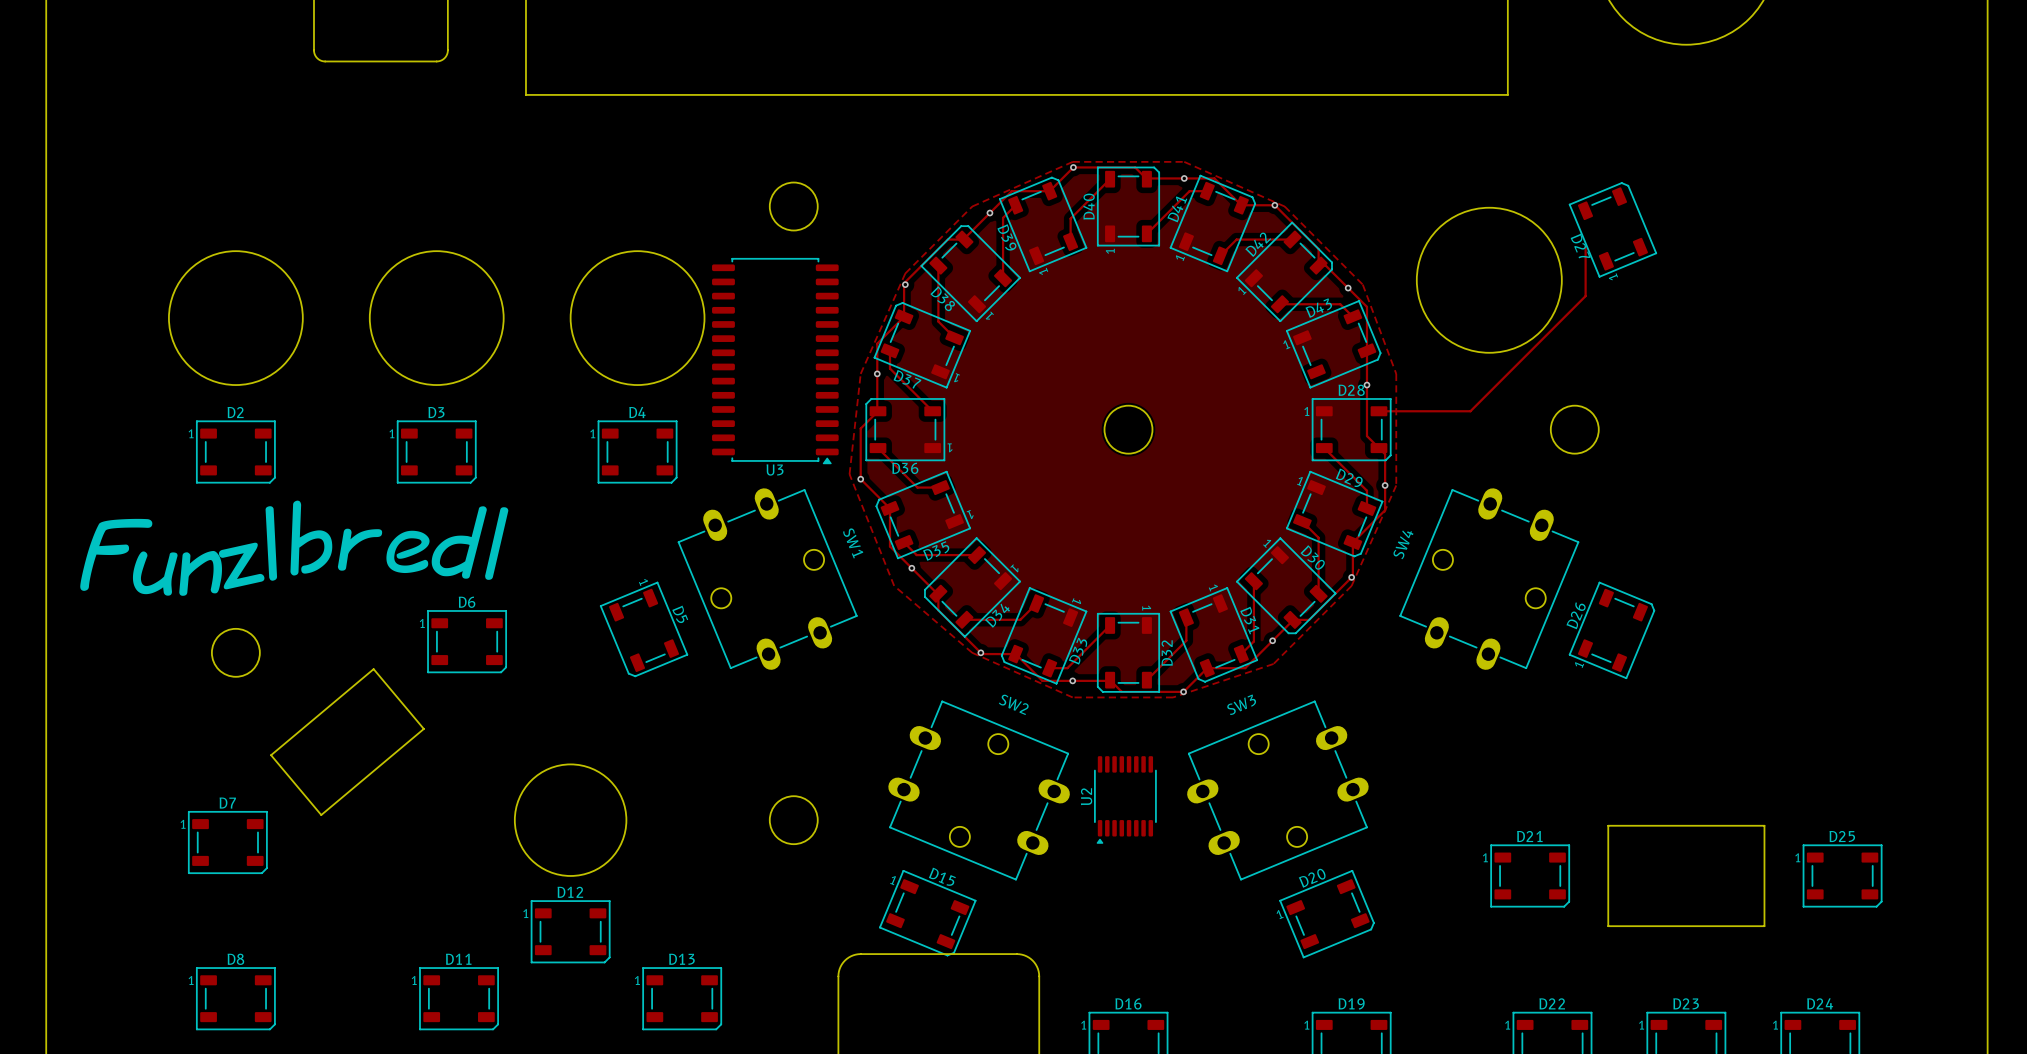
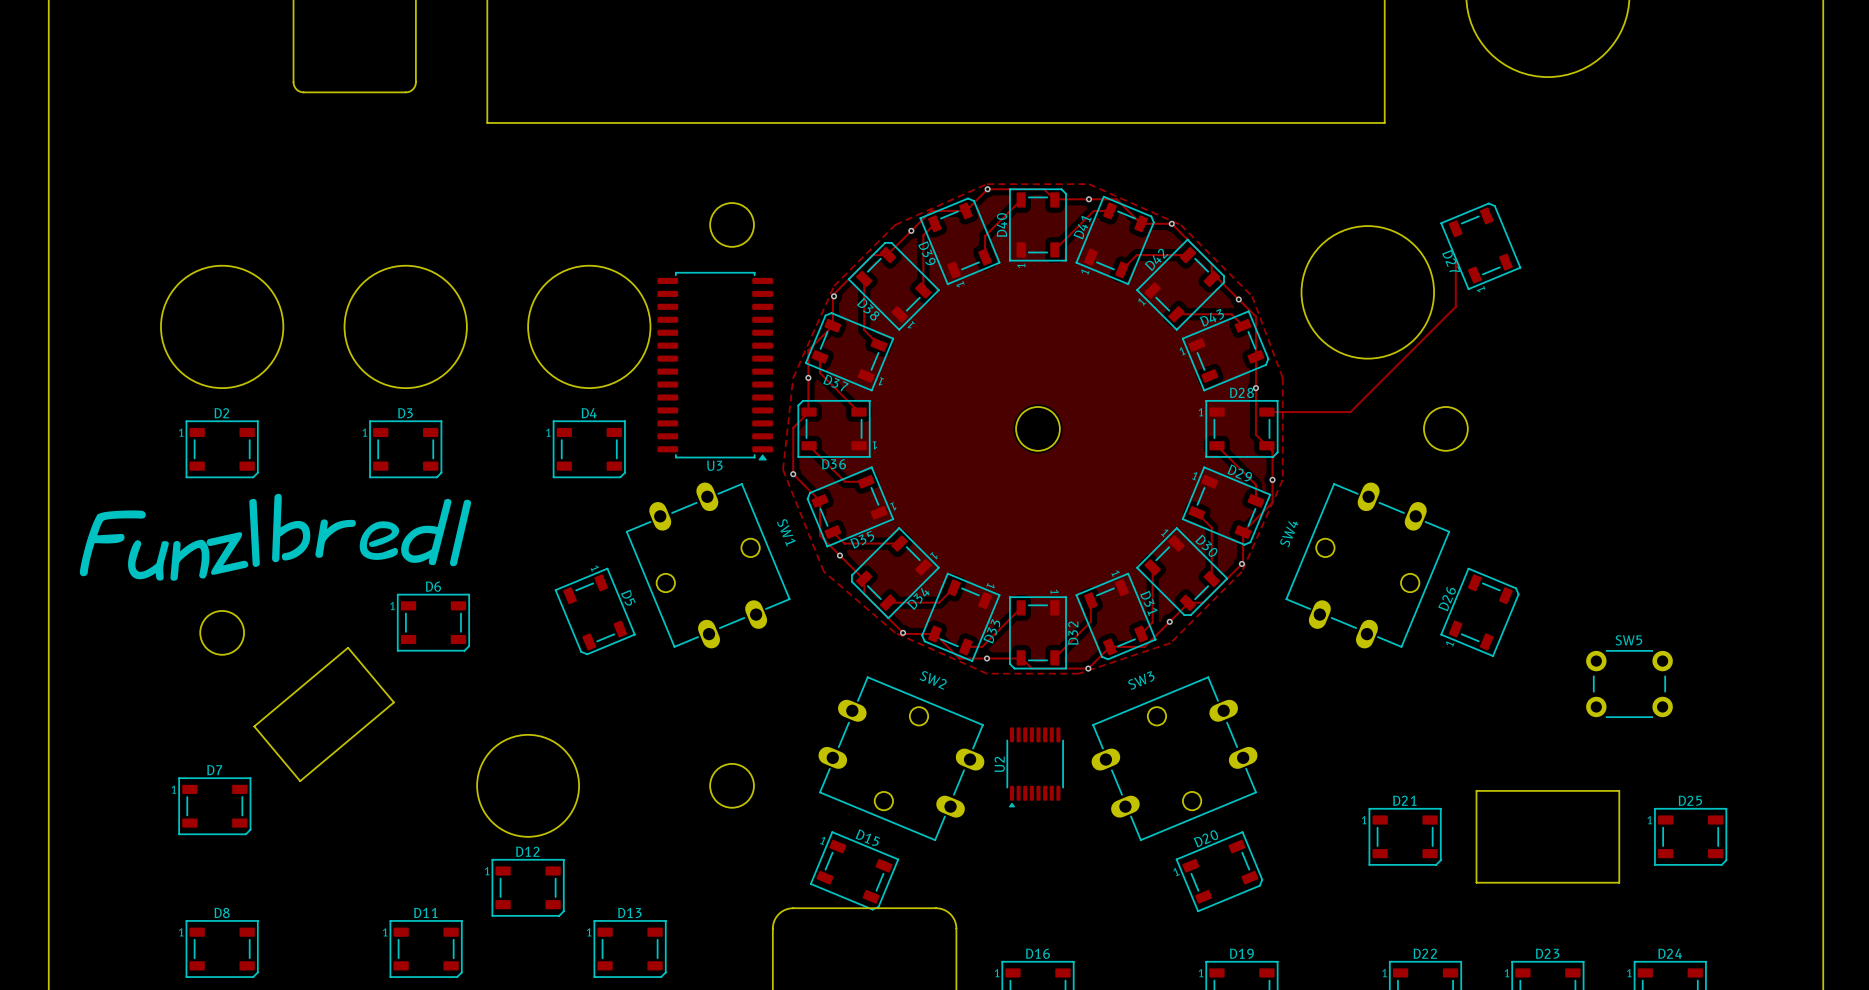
SW5: none -> (1629, 684)

